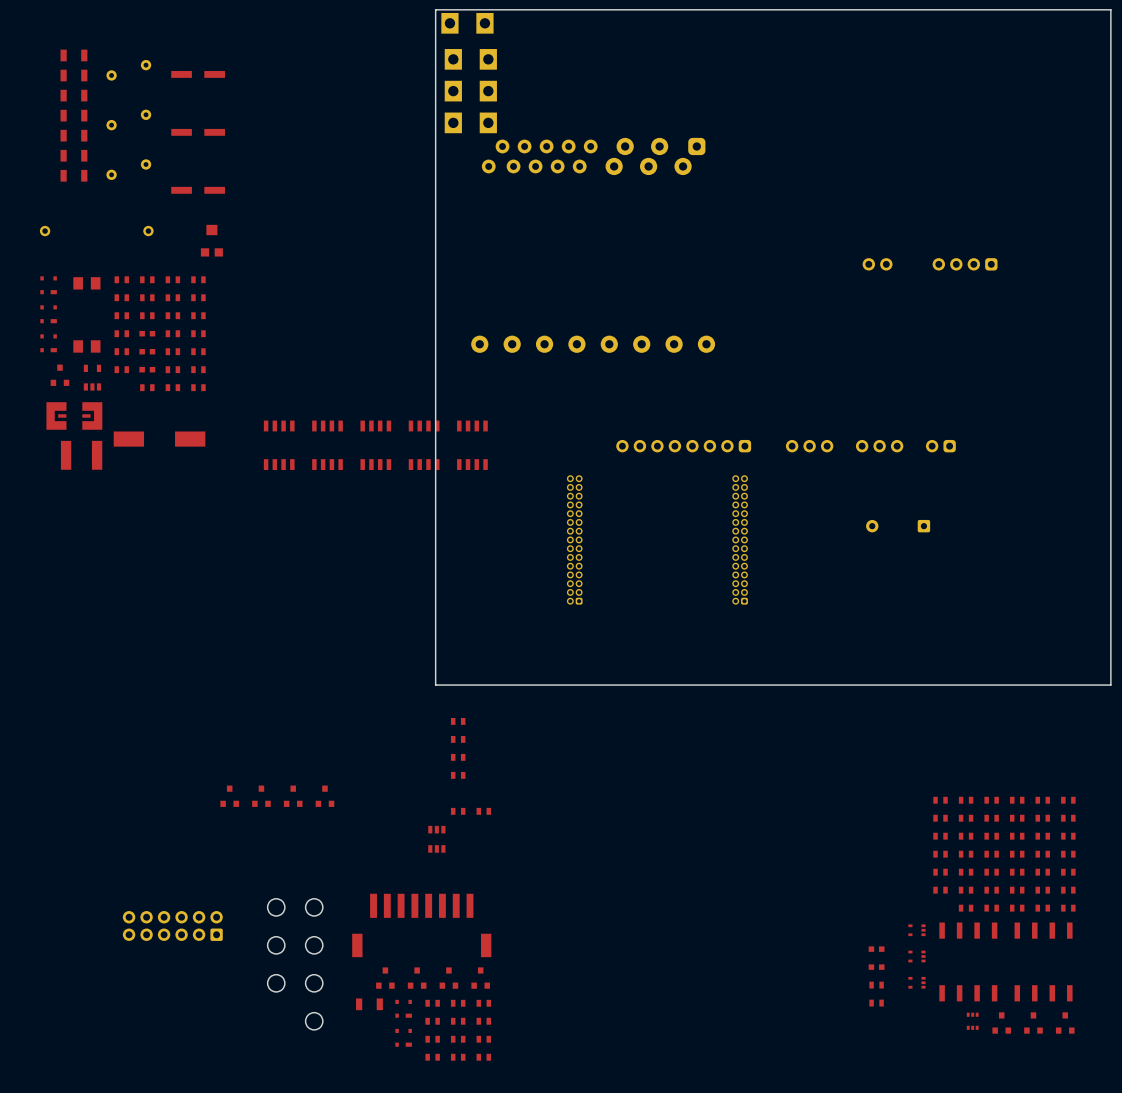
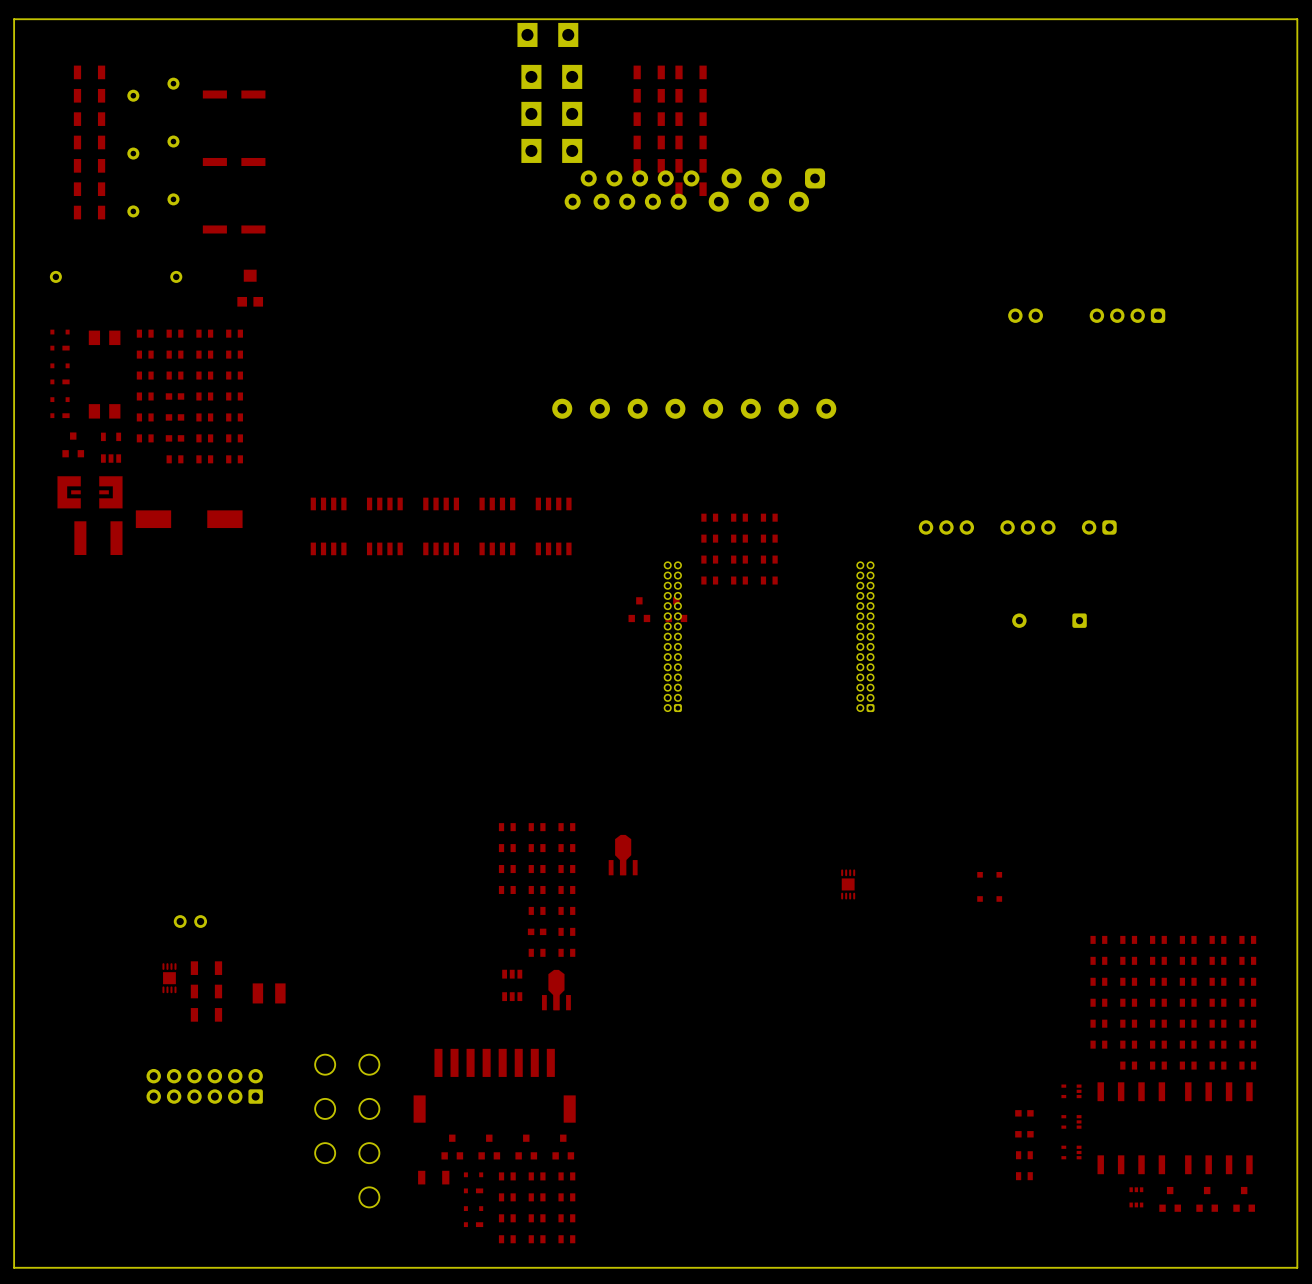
board edge: (435, 9) (435, 685) (1110, 685) -> (510, 19) (14, 19) (14, 1267) (1297, 1267) (1297, 805)
part: none -> (649, 72)
part: none -> (691, 72)
part: none -> (649, 95)
part: none -> (691, 95)
part: none -> (649, 119)
part: none -> (691, 119)
part: none -> (649, 142)
part: none -> (691, 142)
part: none -> (649, 165)
part: none -> (691, 165)
part: none -> (691, 189)
part: none -> (709, 517)
part: none -> (739, 517)
part: none -> (769, 517)
part: (683, 446) -> none
part: none -> (709, 538)
part: none -> (739, 538)
part: none -> (769, 538)
part: none -> (709, 559)
part: none -> (739, 559)
part: none -> (769, 559)
part: none -> (709, 580)
part: none -> (739, 580)
part: none -> (769, 580)
part: none -> (639, 609)
part: none -> (676, 609)
part: none -> (507, 827)
part: none -> (537, 827)
part: none -> (566, 827)
part: none -> (507, 848)
part: none -> (566, 848)
part: none -> (623, 855)
part: none -> (507, 869)
part: none -> (566, 869)
part: none -> (989, 874)
part: none -> (848, 884)
part: none -> (507, 889)
part: none -> (566, 889)
part: none -> (989, 898)
part: none -> (566, 910)
part: none -> (190, 921)
part: none -> (537, 931)
part: none -> (566, 931)
part: (229, 796) -> none
part: (261, 796) -> none
part: (293, 796) -> none
part: (324, 796) -> none
part: none -> (206, 968)
part: none -> (169, 978)
part: none -> (556, 990)
part: none -> (206, 991)
part: none -> (269, 993)
part: none -> (206, 1014)

